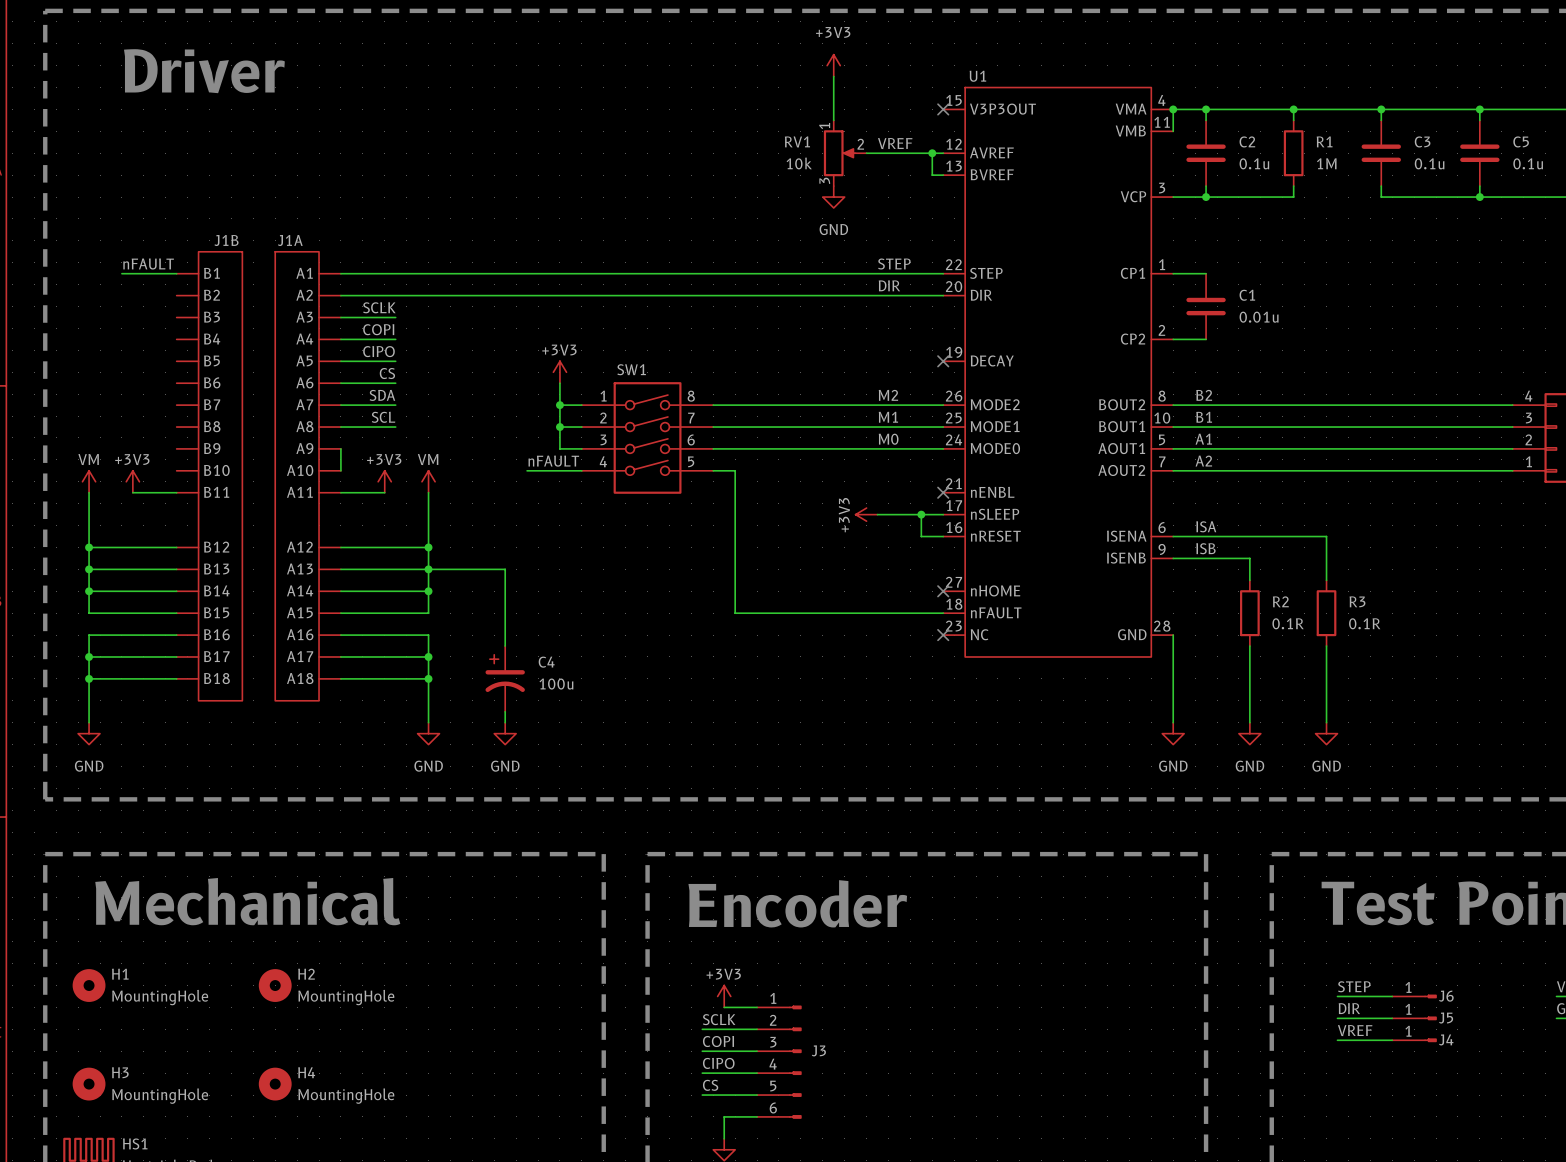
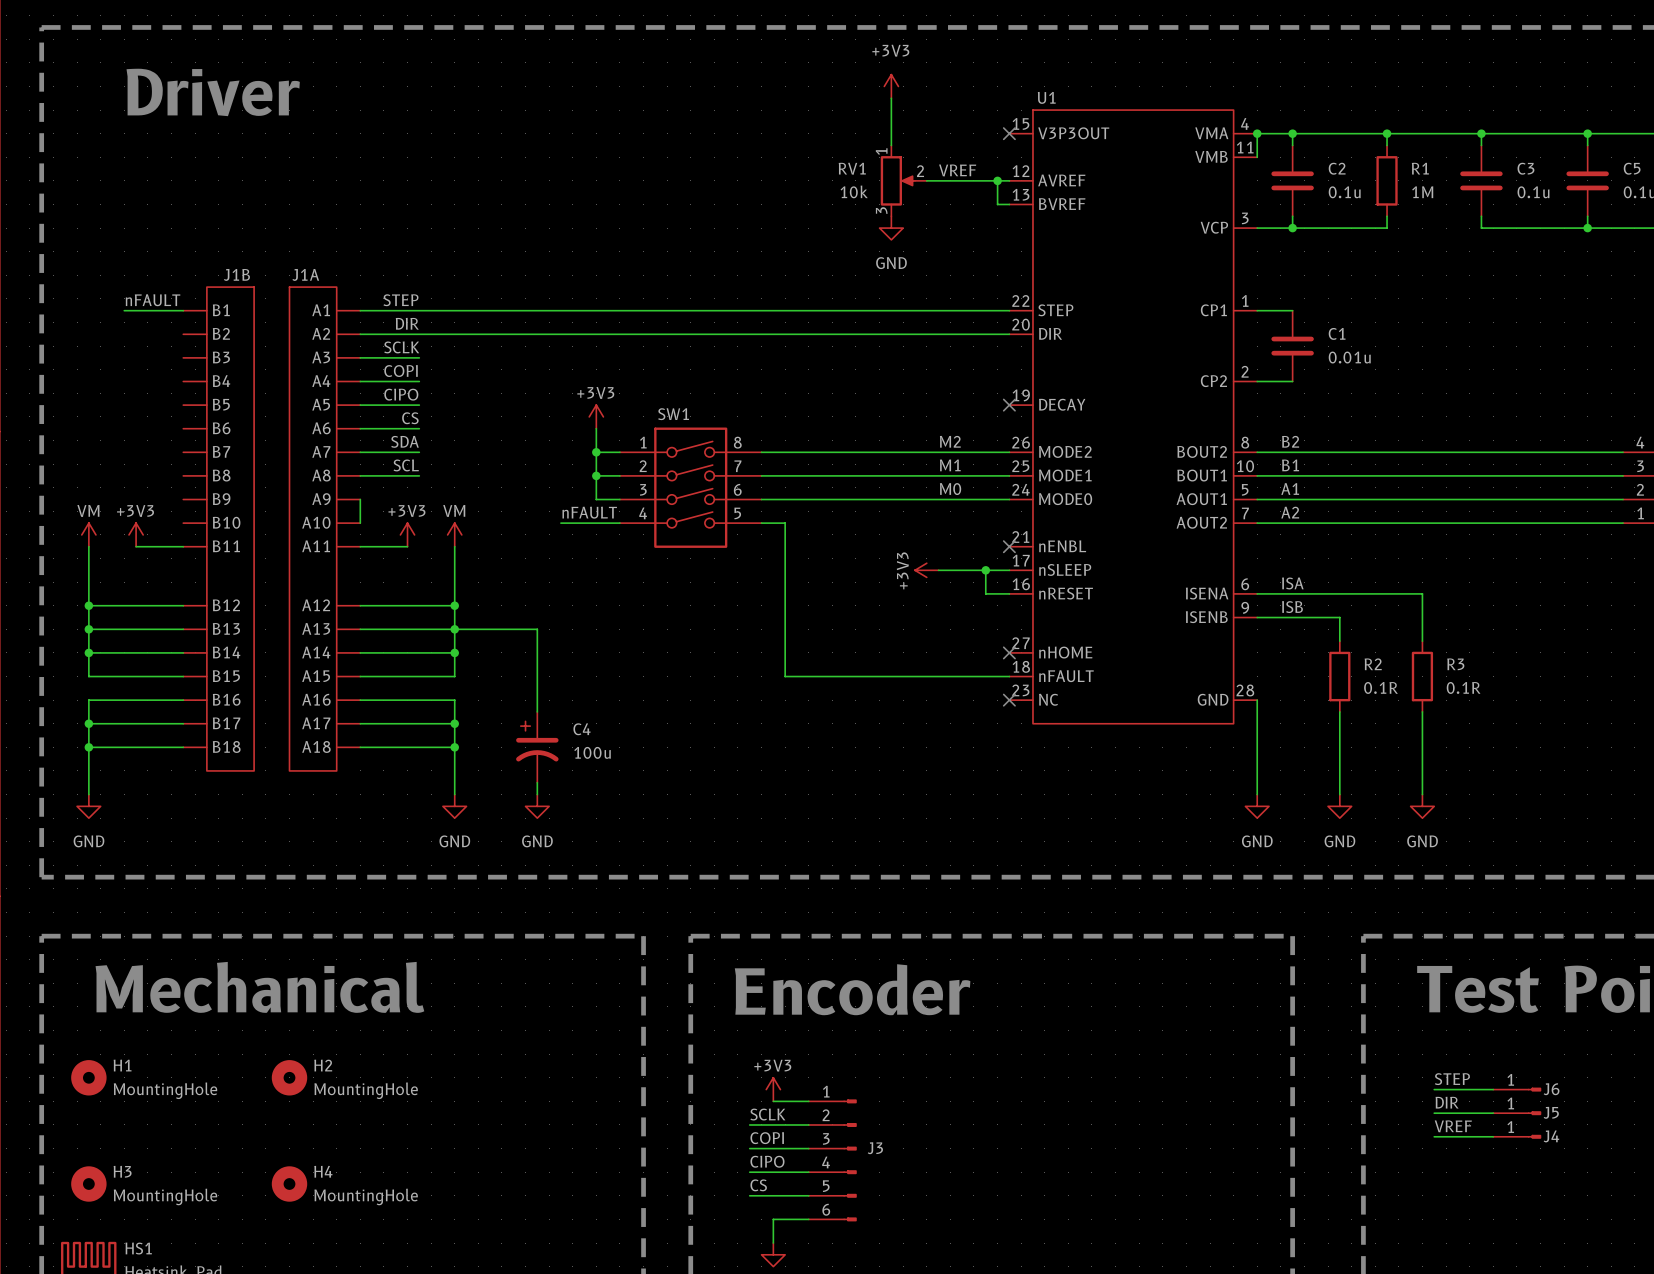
label: none -> STEP (400, 300)
label: STEP (894, 264) -> none
label: none -> DIR (407, 323)
label: DIR (889, 285) -> none

